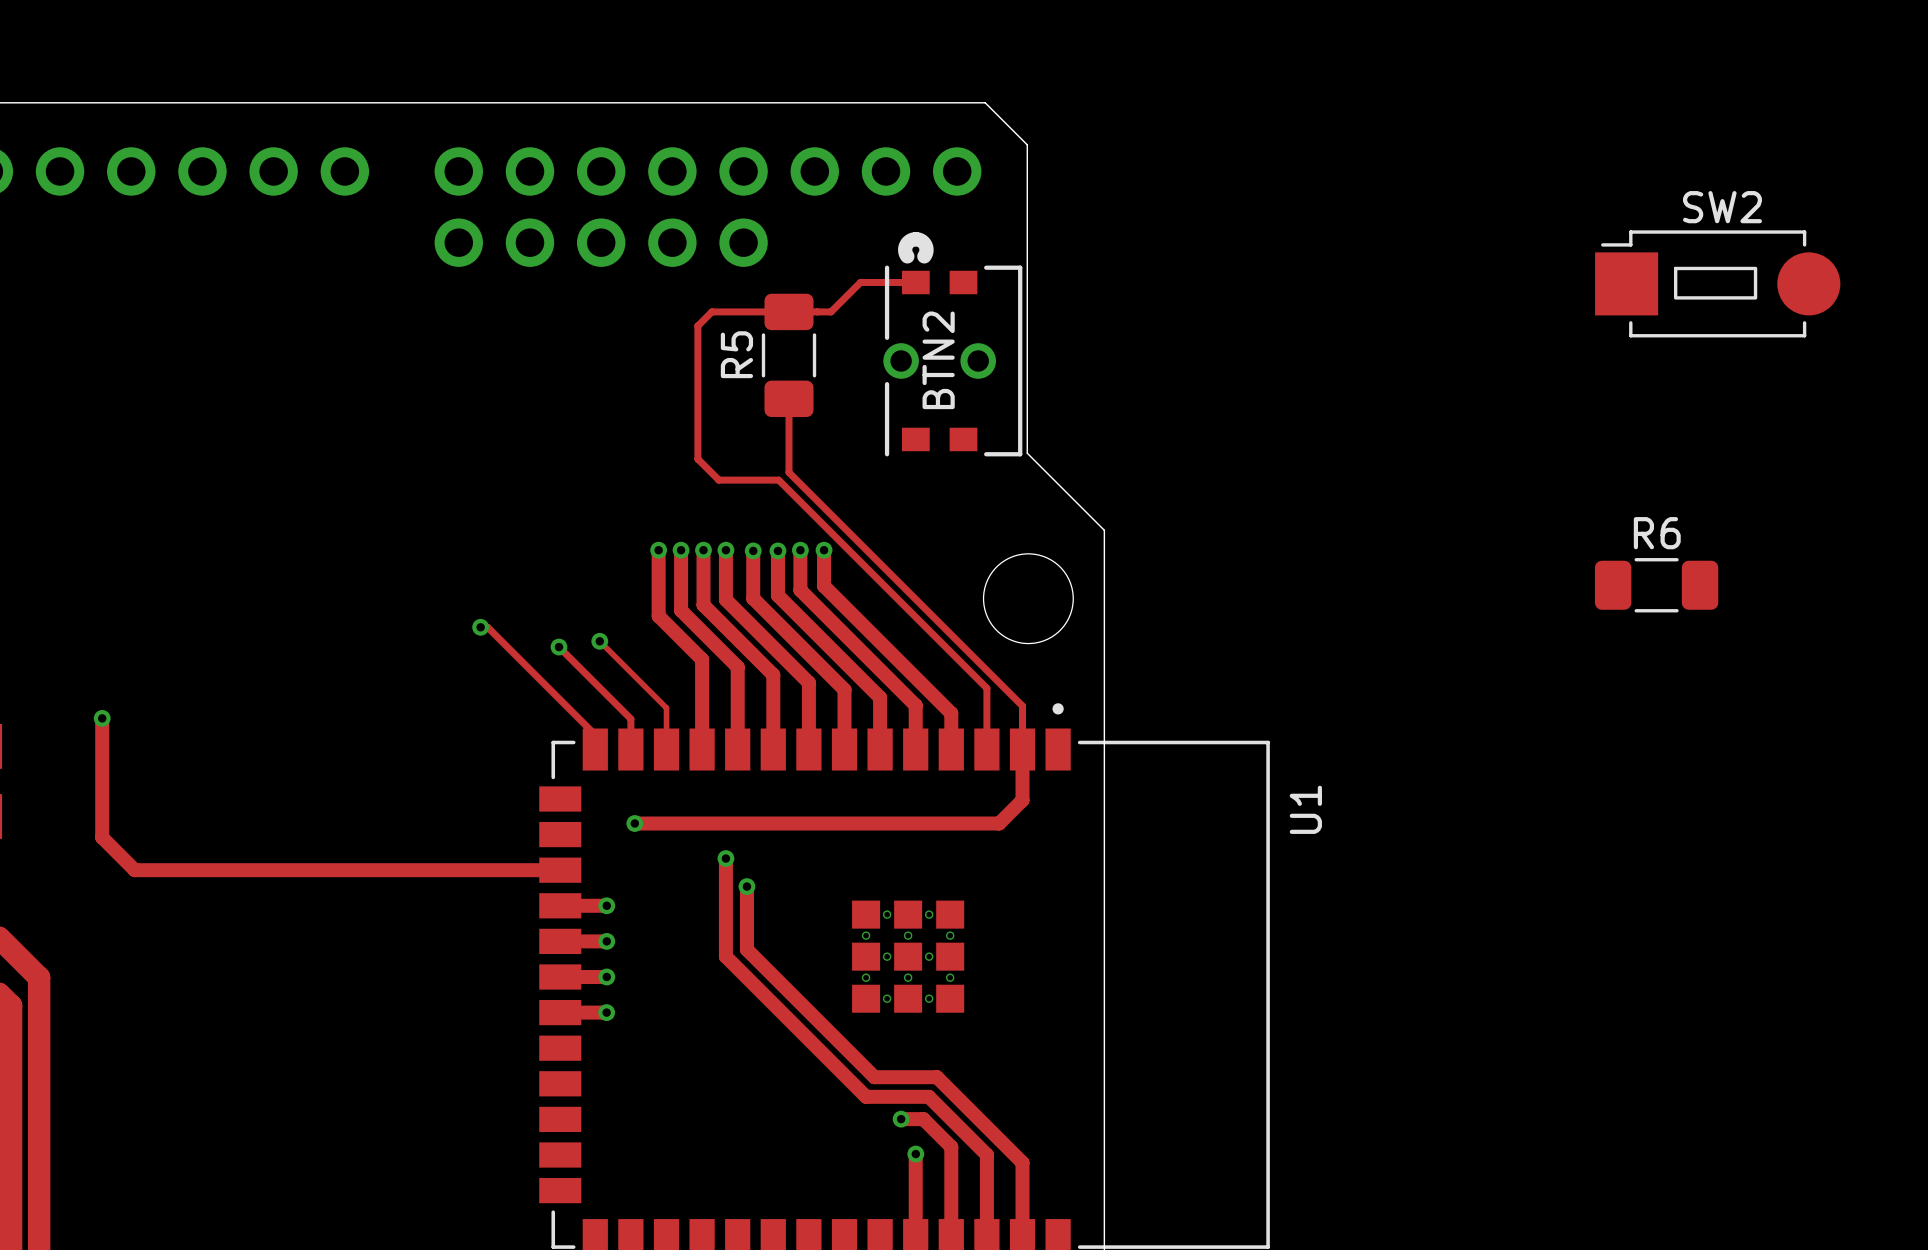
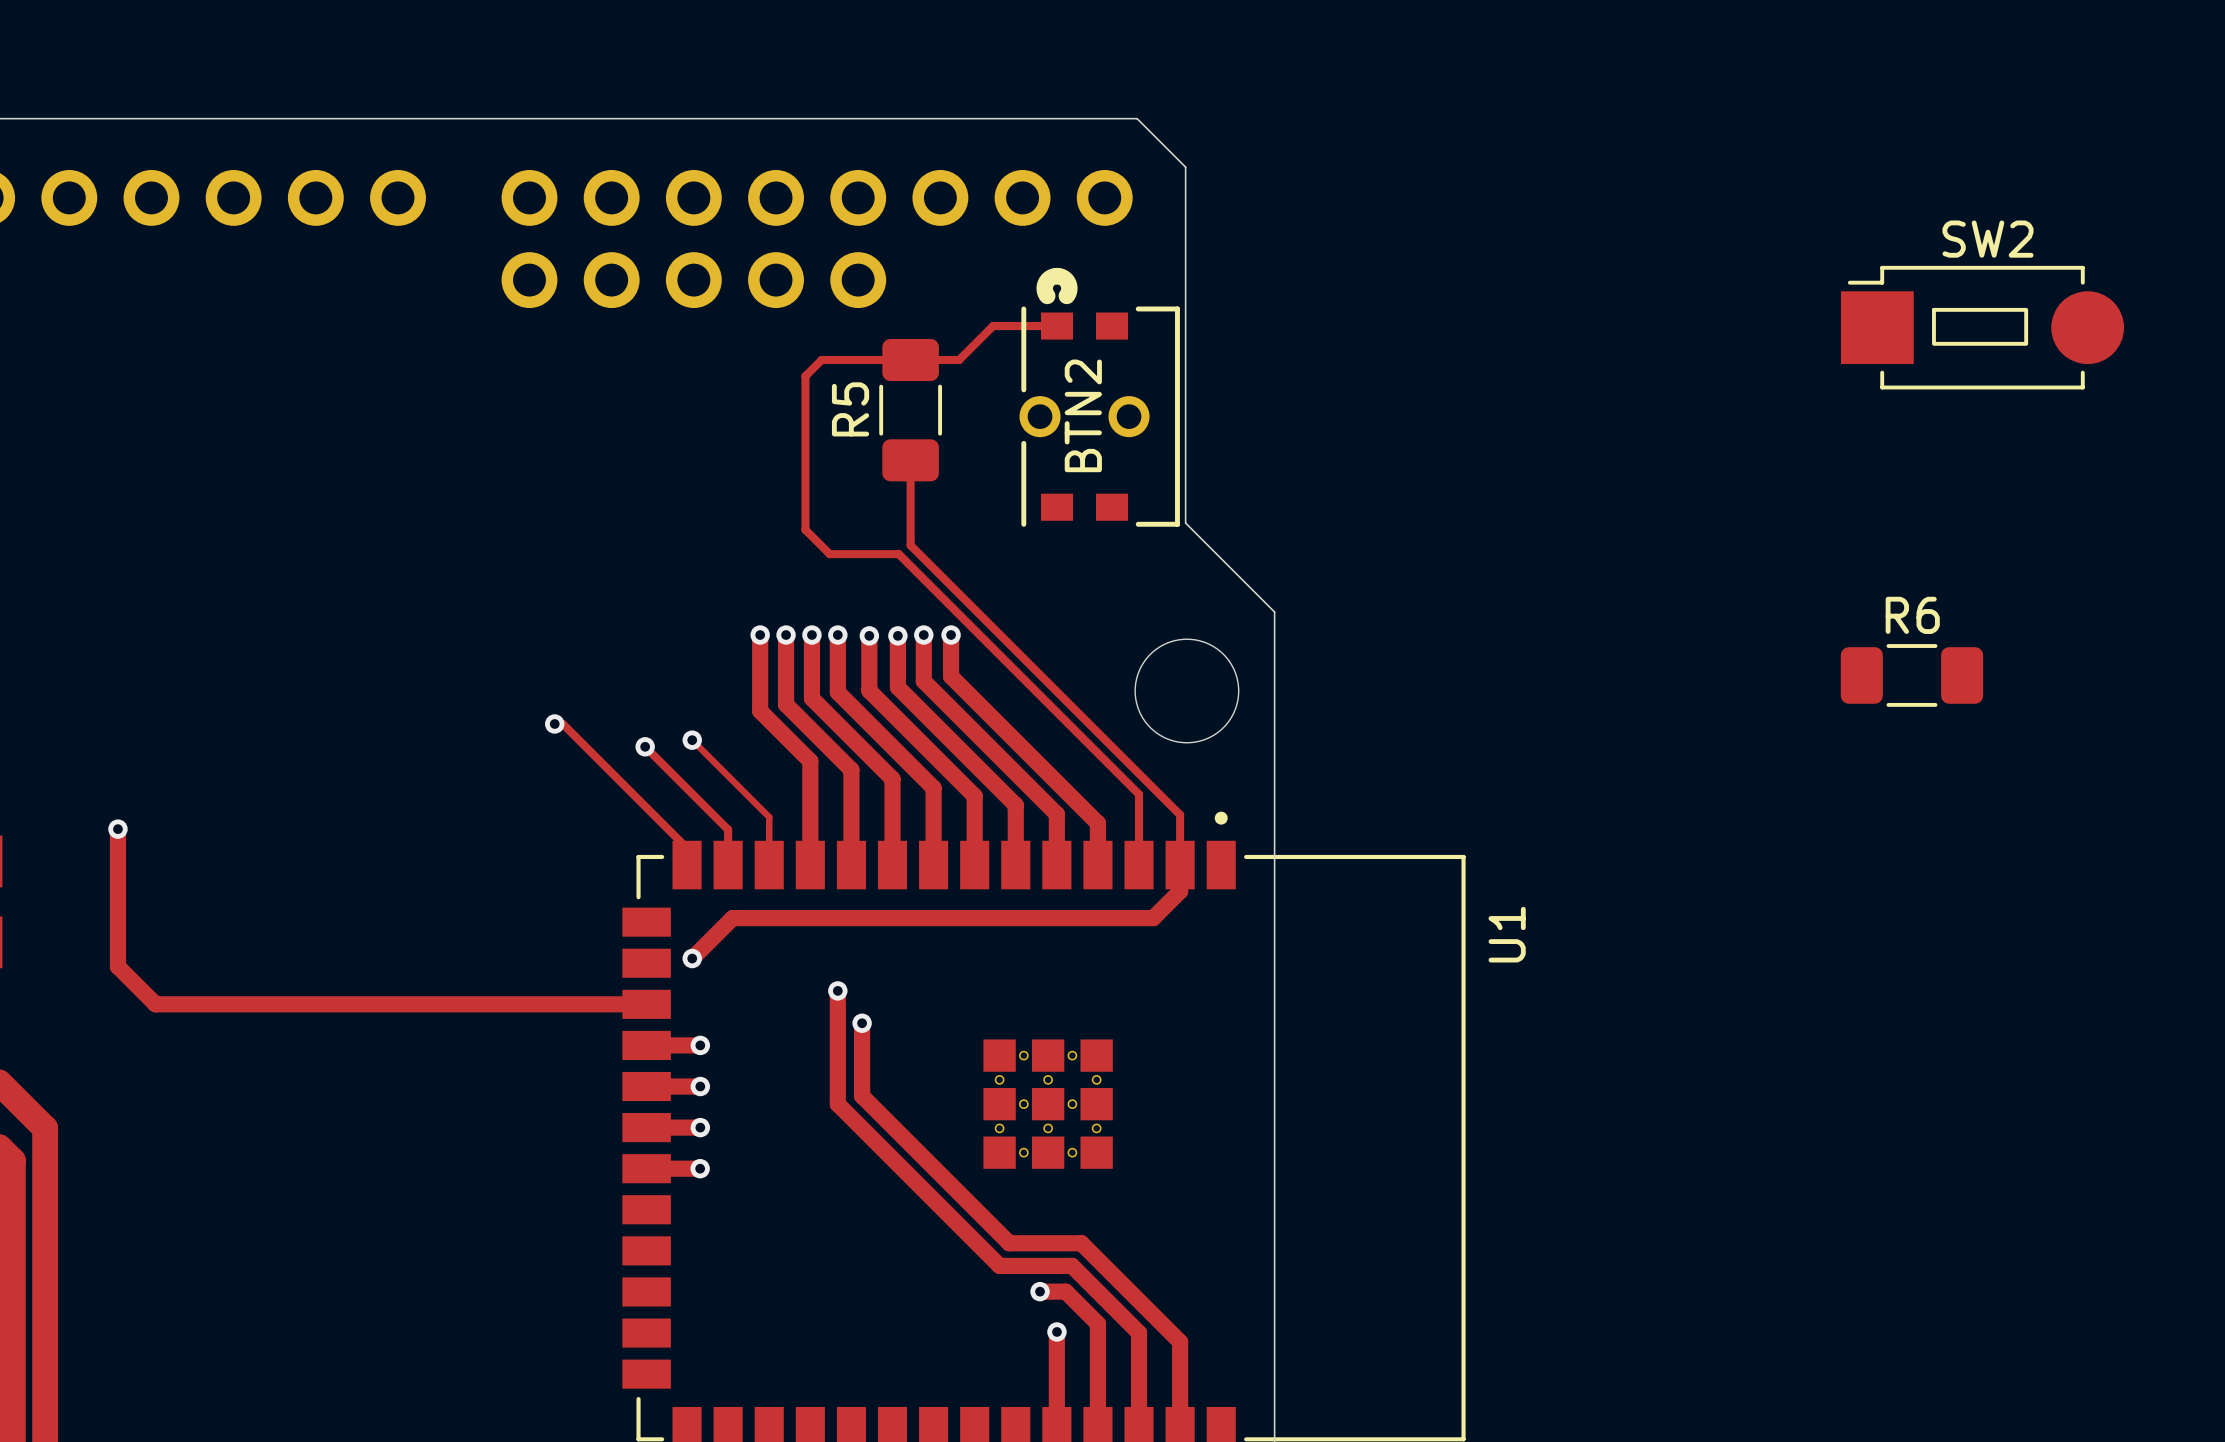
track: (1022, 772) (1022, 800) (999, 823) (634, 823) -> (1180, 891) (1153, 918) (732, 918) (692, 958)
via position: (634, 823) -> (692, 958)

